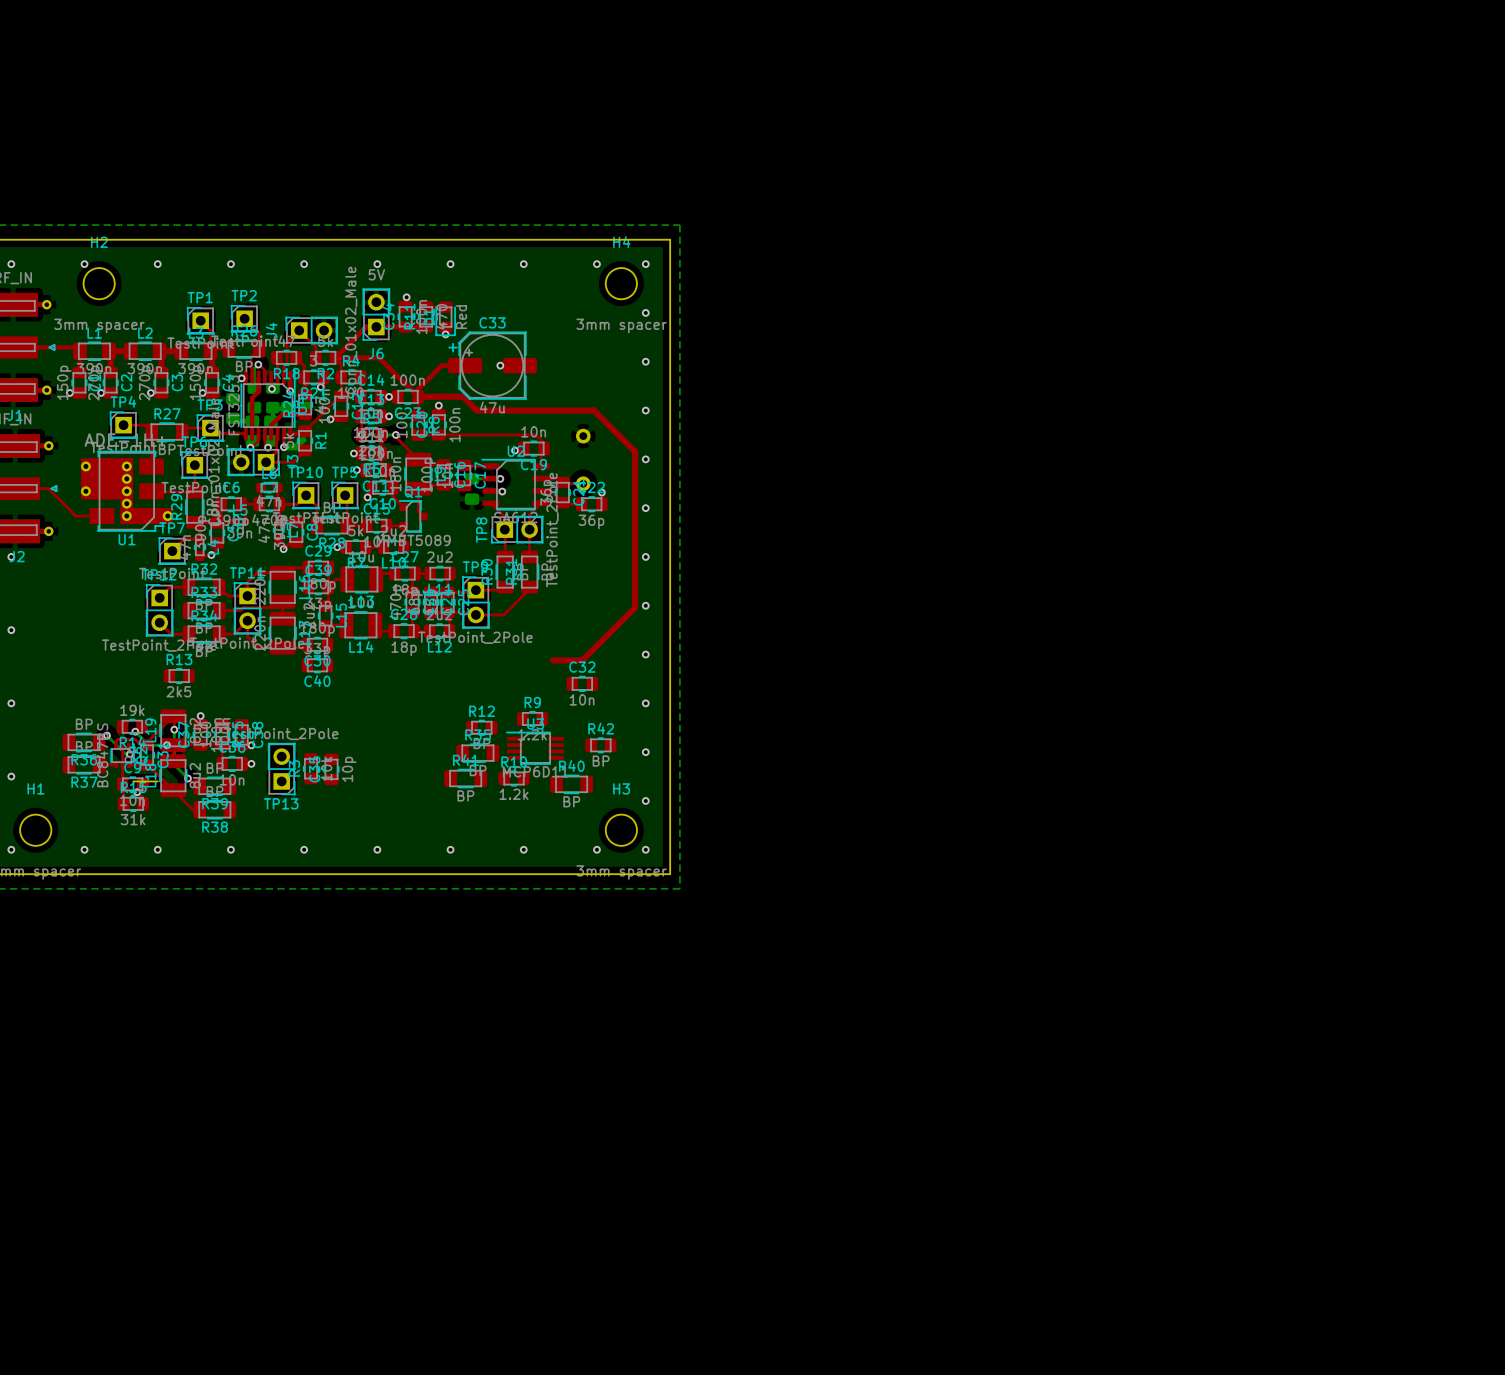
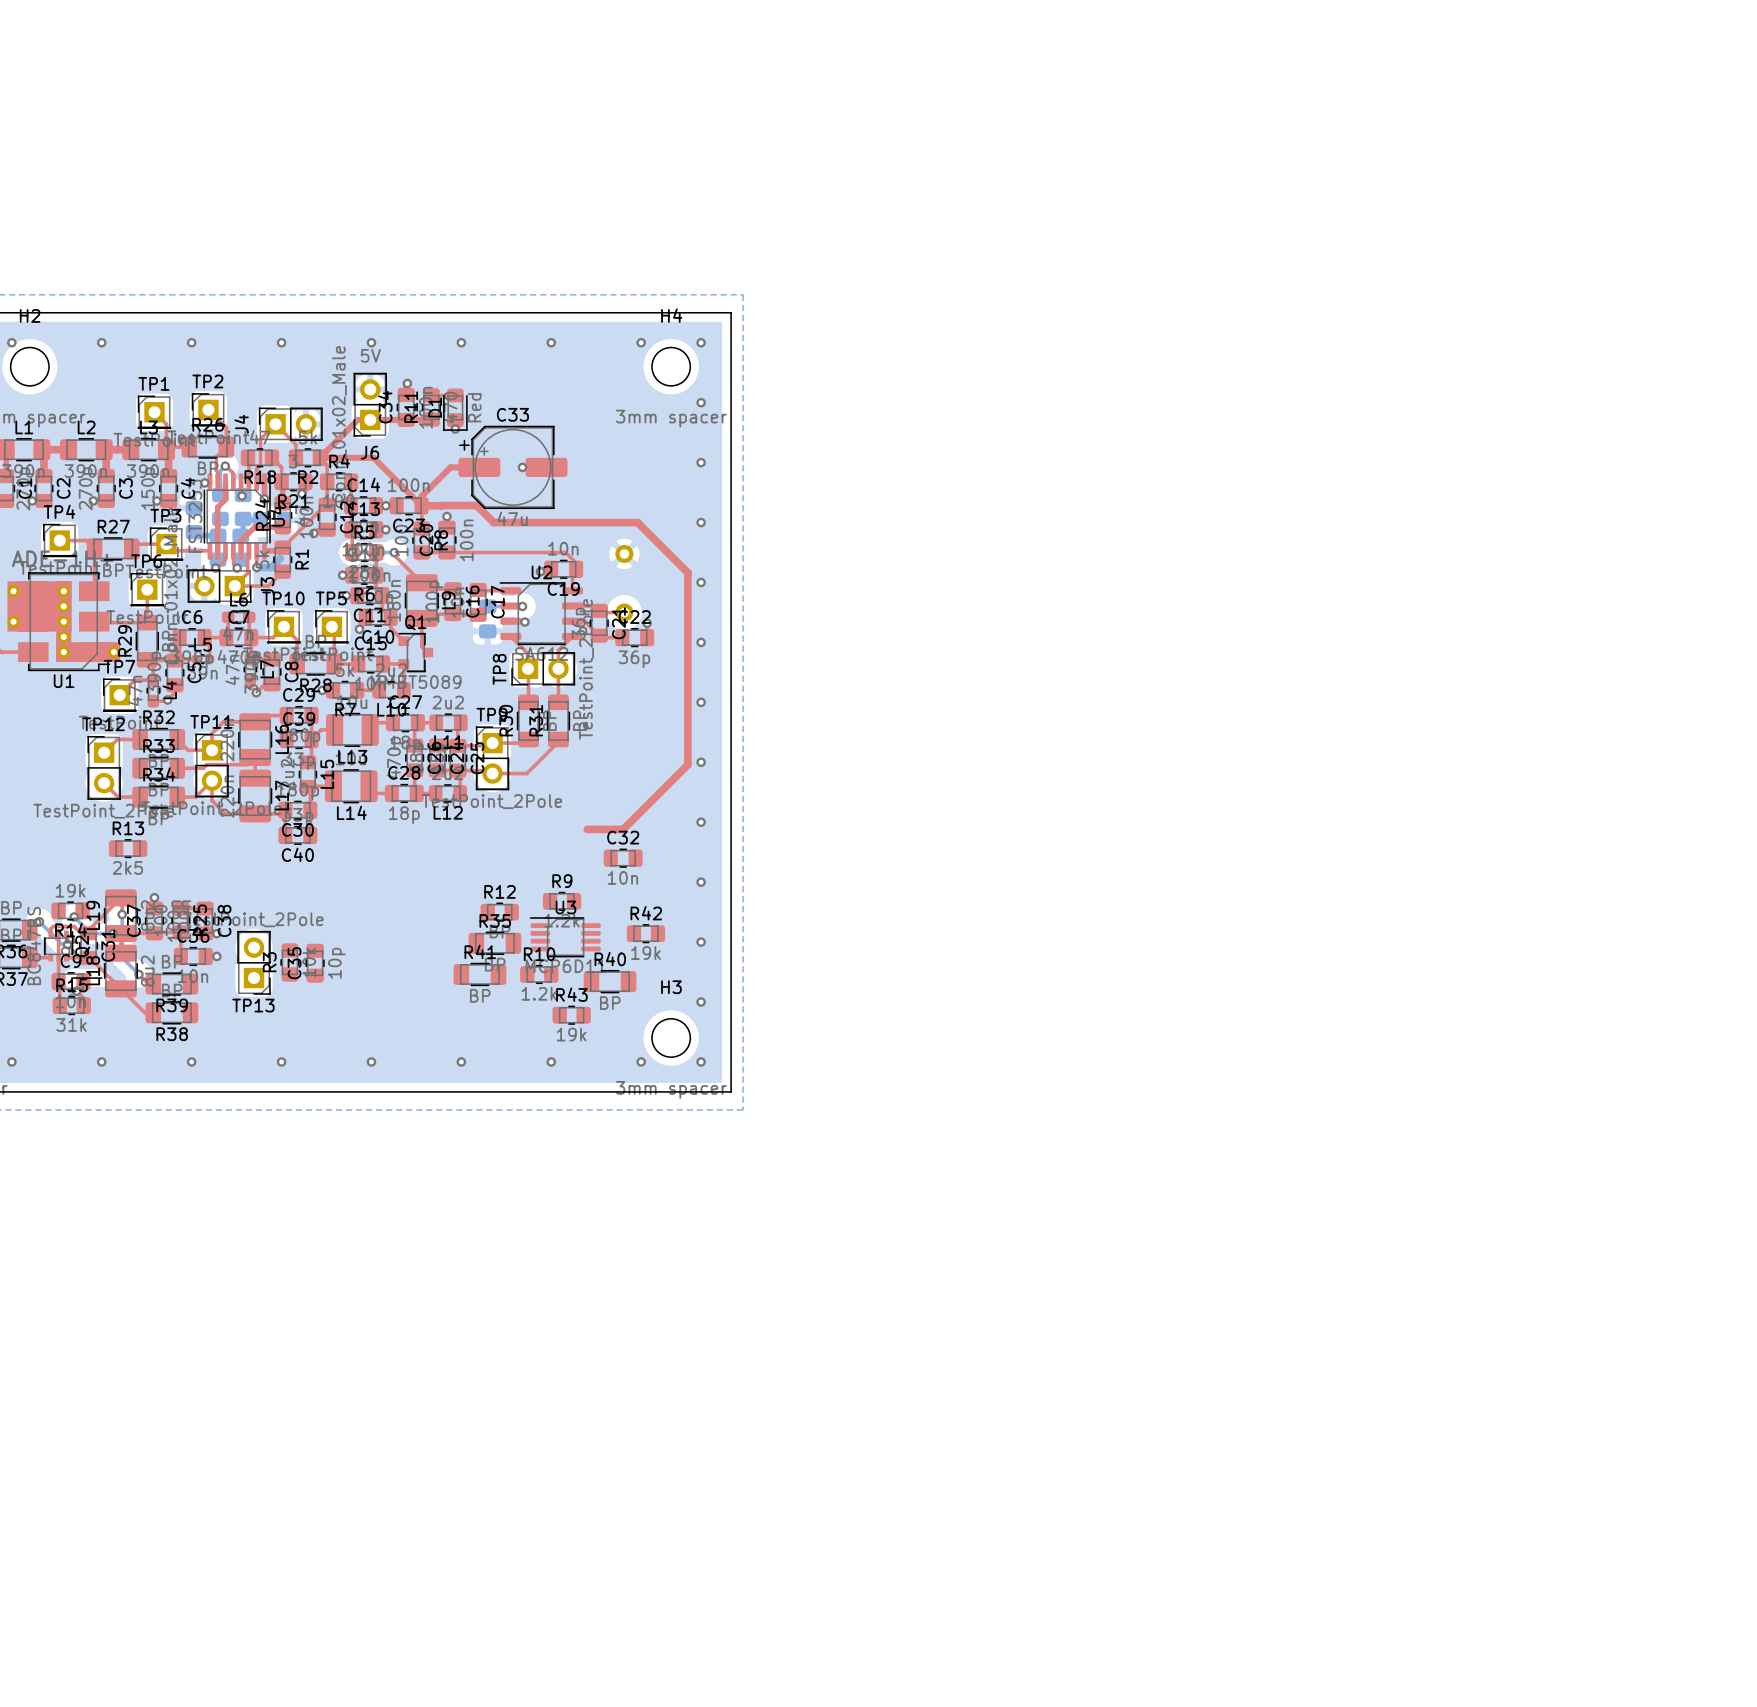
R42 value: BP (601, 761) -> 19k (645, 953)
R43: none -> 19k (571, 1015)

